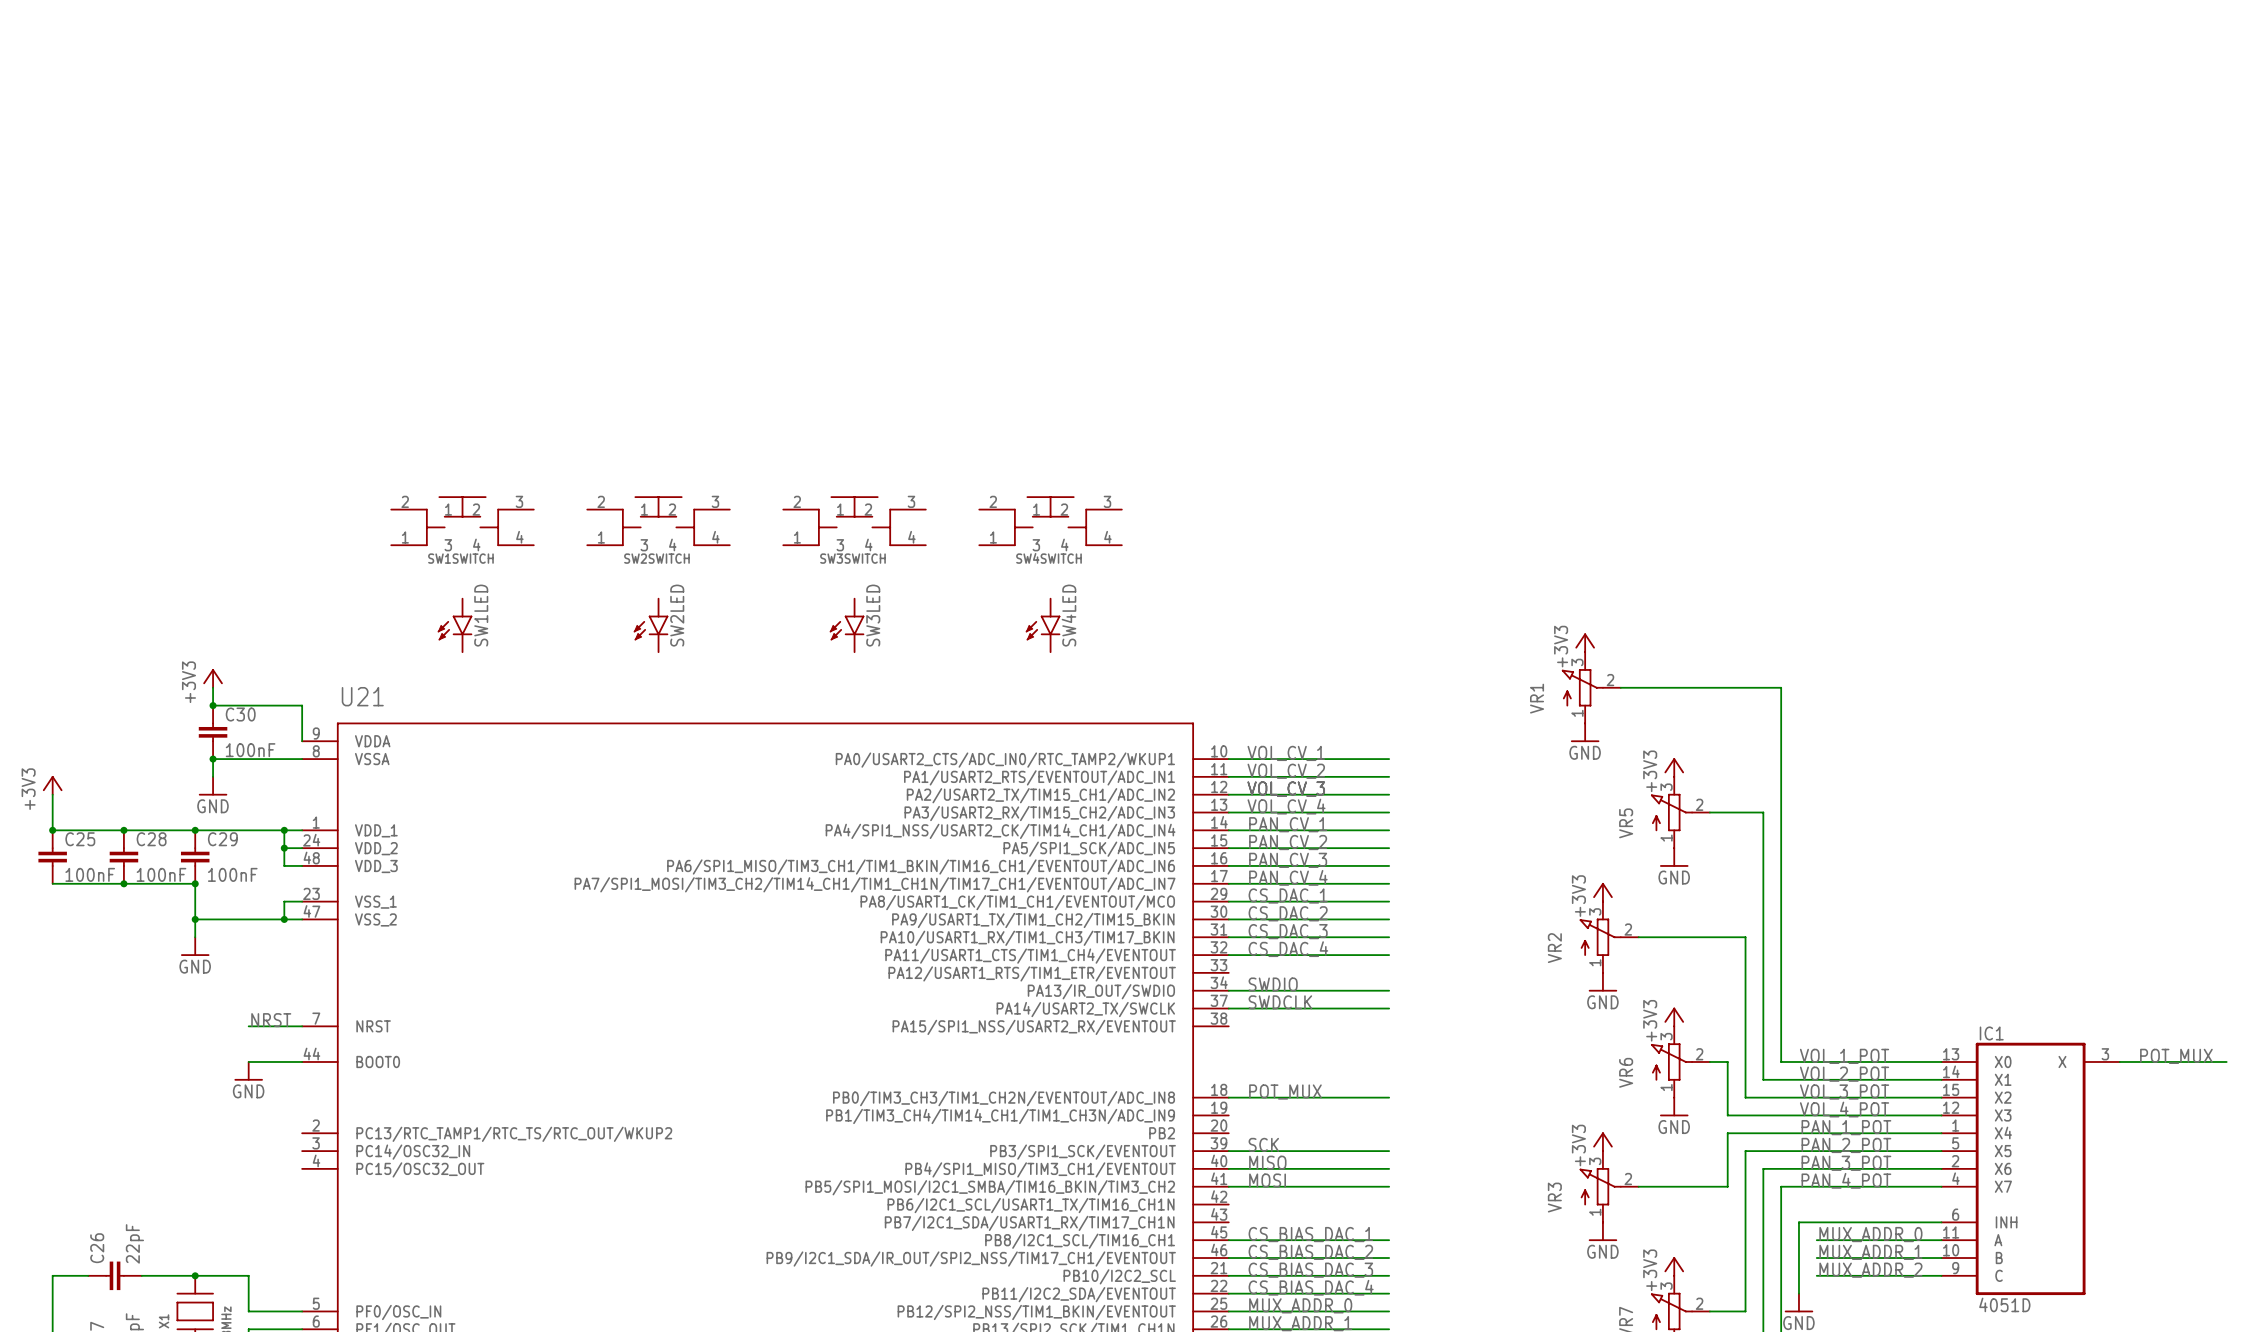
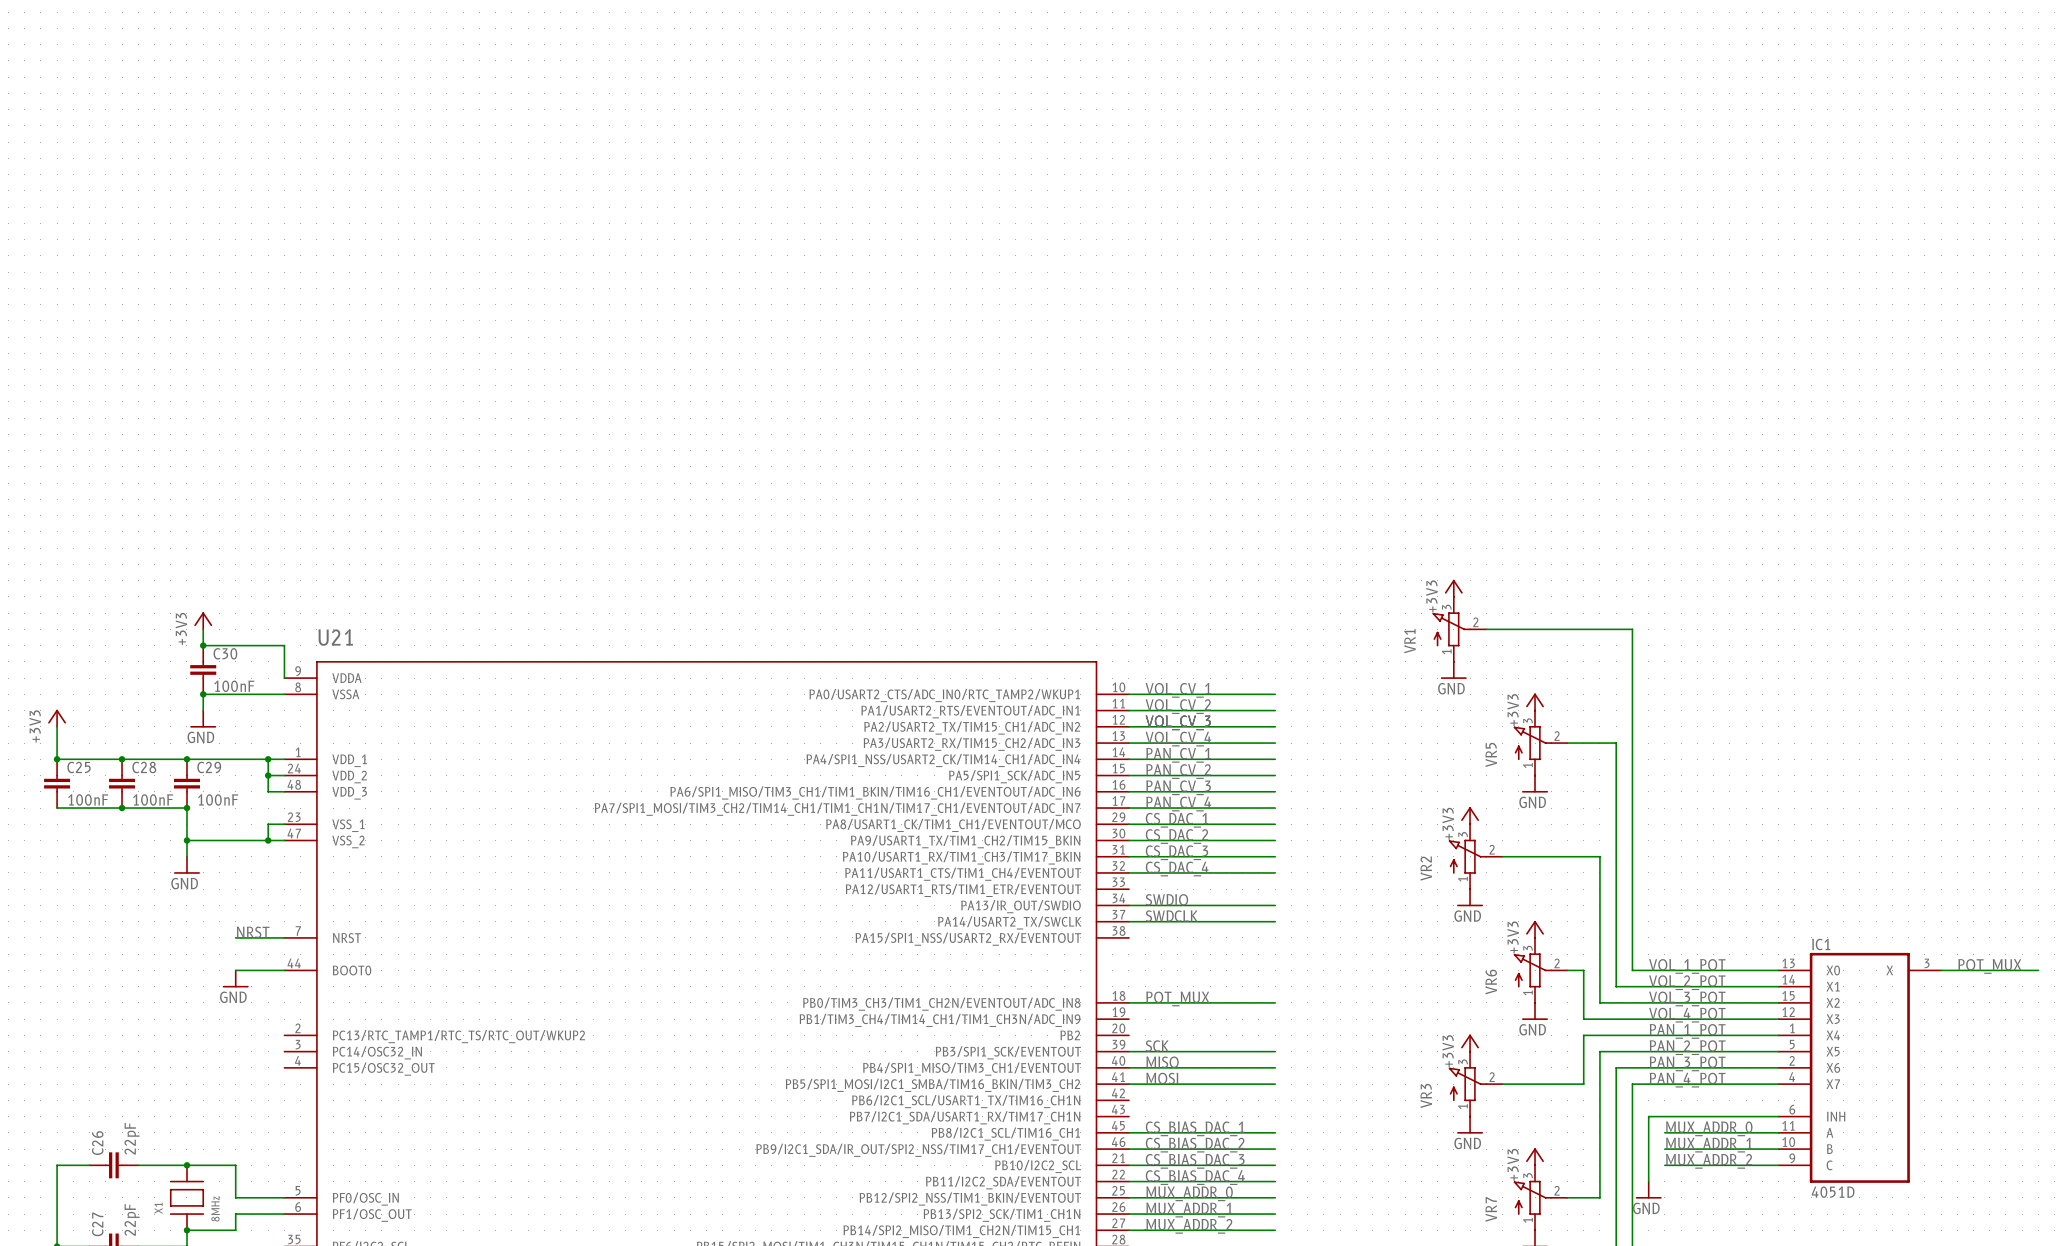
SW1SWITCH: (462, 521) -> none
SW2SWITCH: (658, 521) -> none
SW3SWITCH: (854, 521) -> none
SW4SWITCH: (1050, 521) -> none
SW1LED: (455, 625) -> none
SW2LED: (651, 625) -> none
SW3LED: (847, 625) -> none
SW4LED: (1043, 625) -> none

